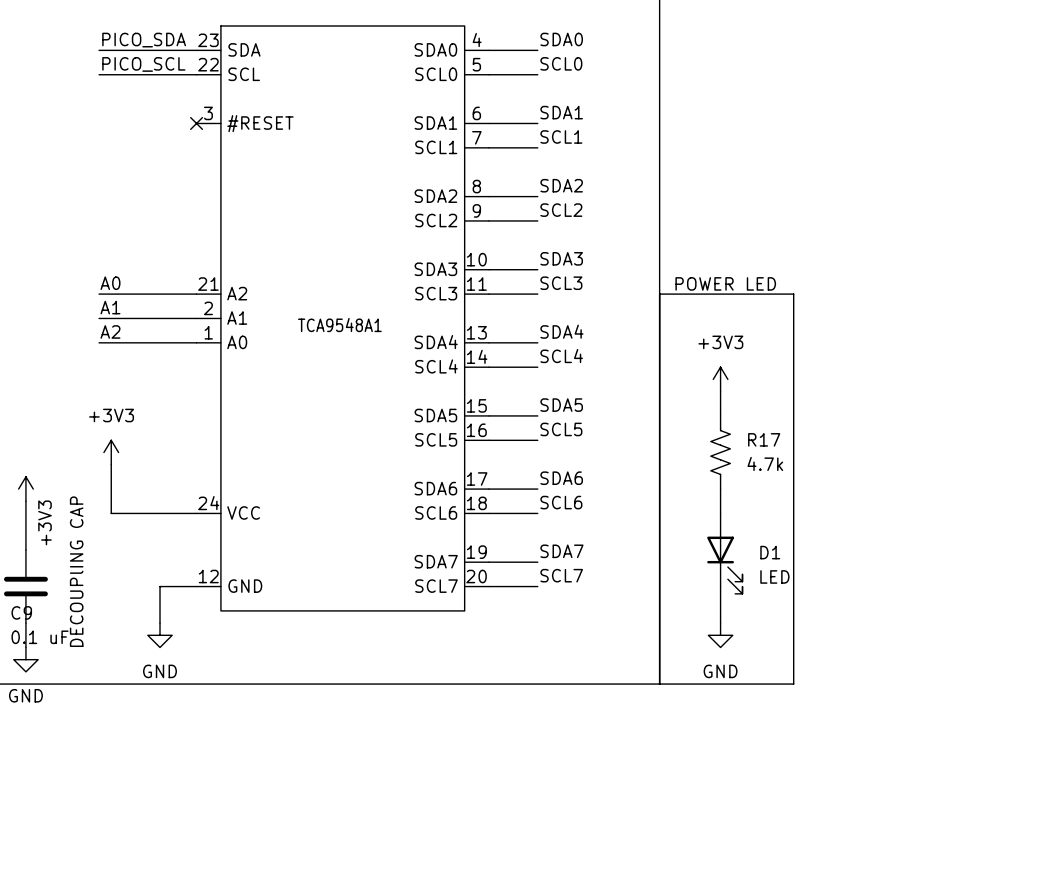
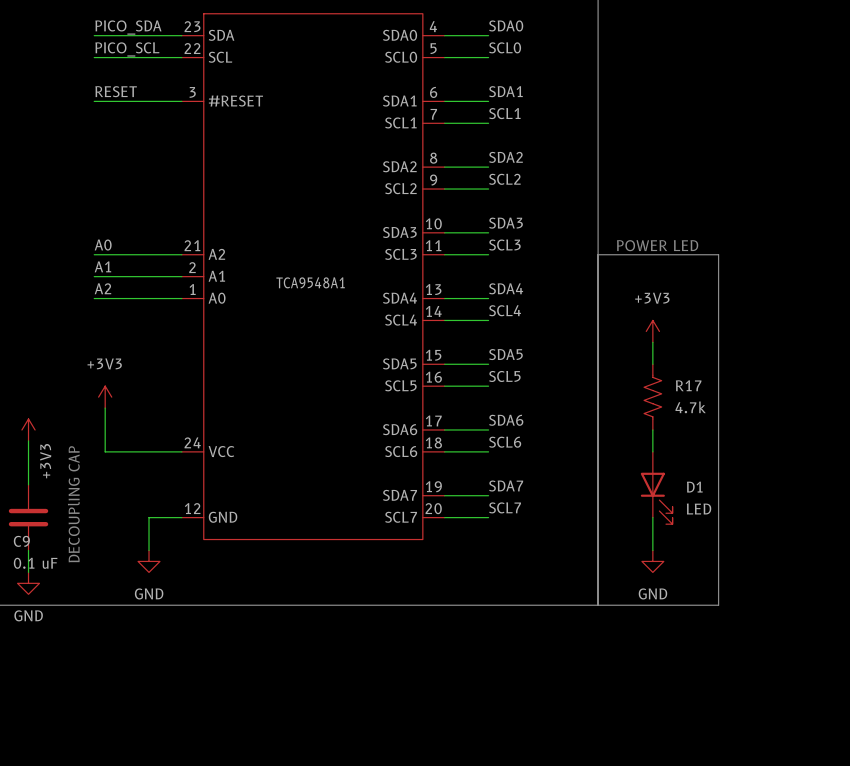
label: none -> RESET (116, 91)
wire: none -> (94, 101) (181, 101)
no-connect mark: (196, 123) -> none

